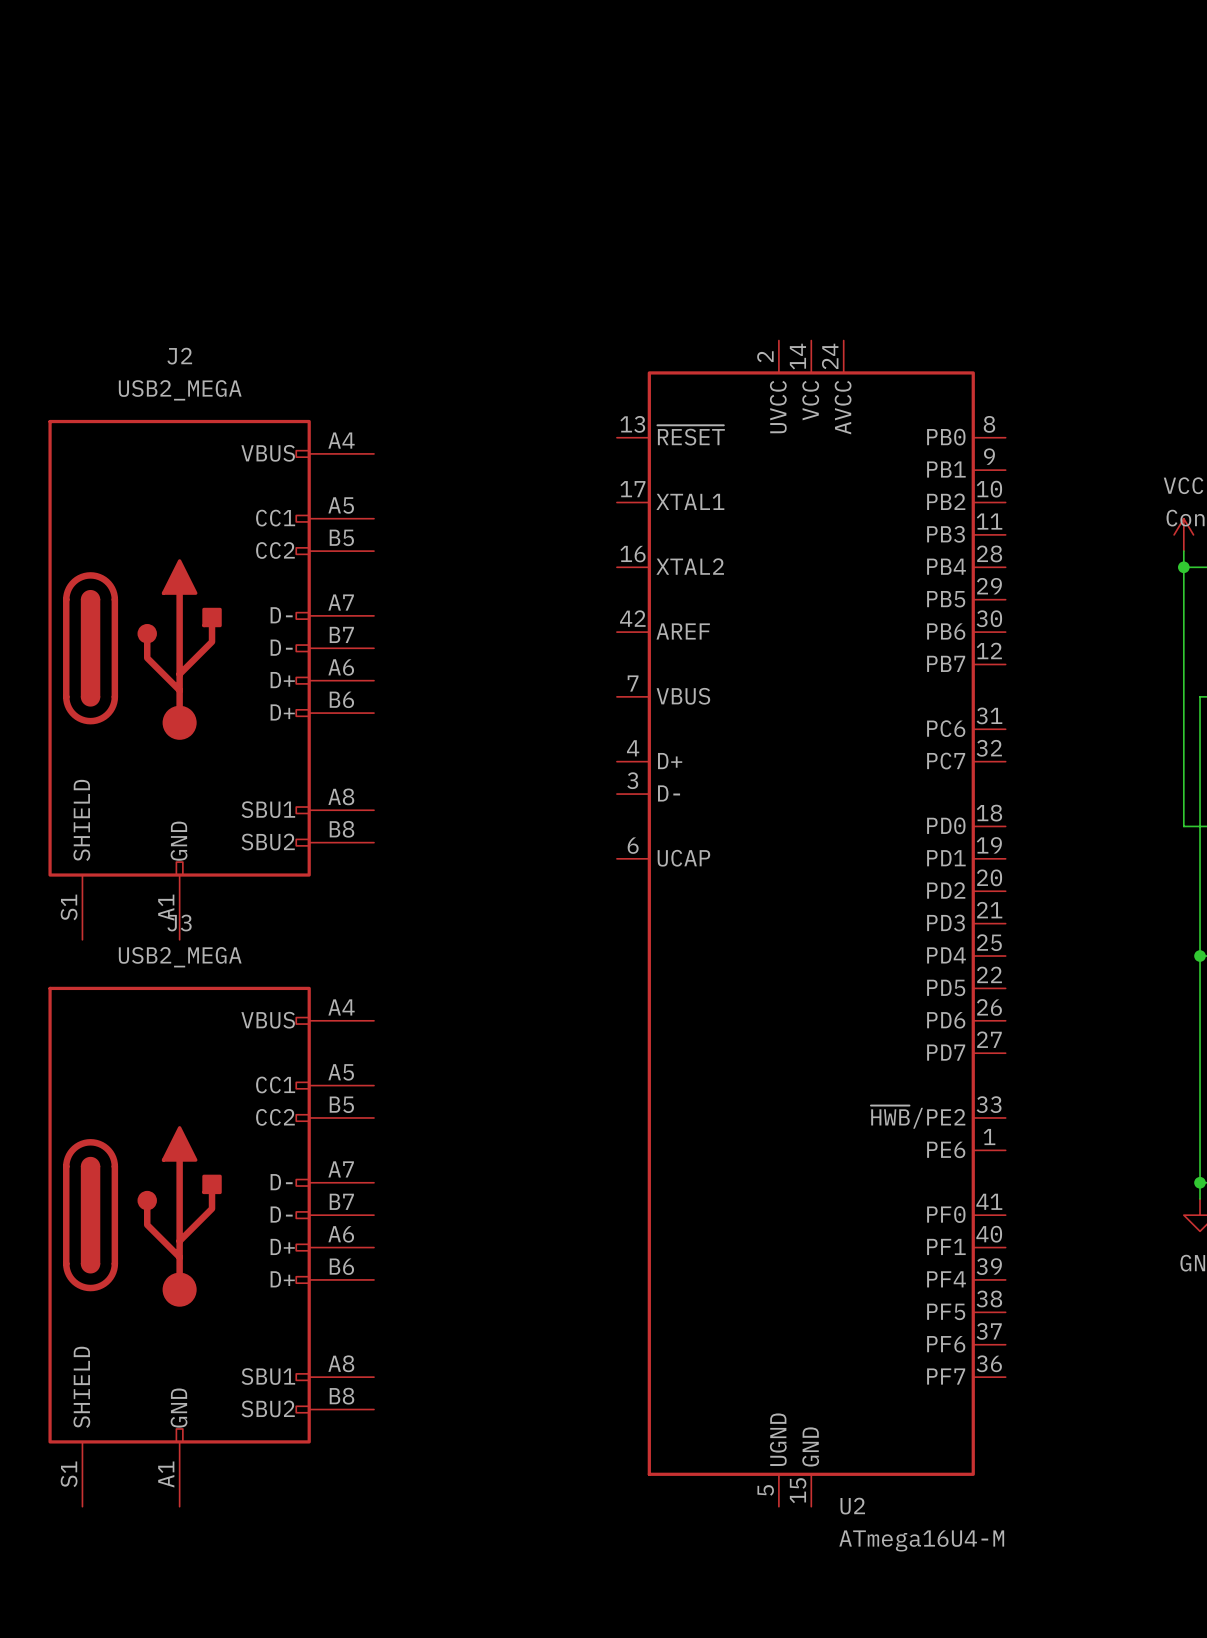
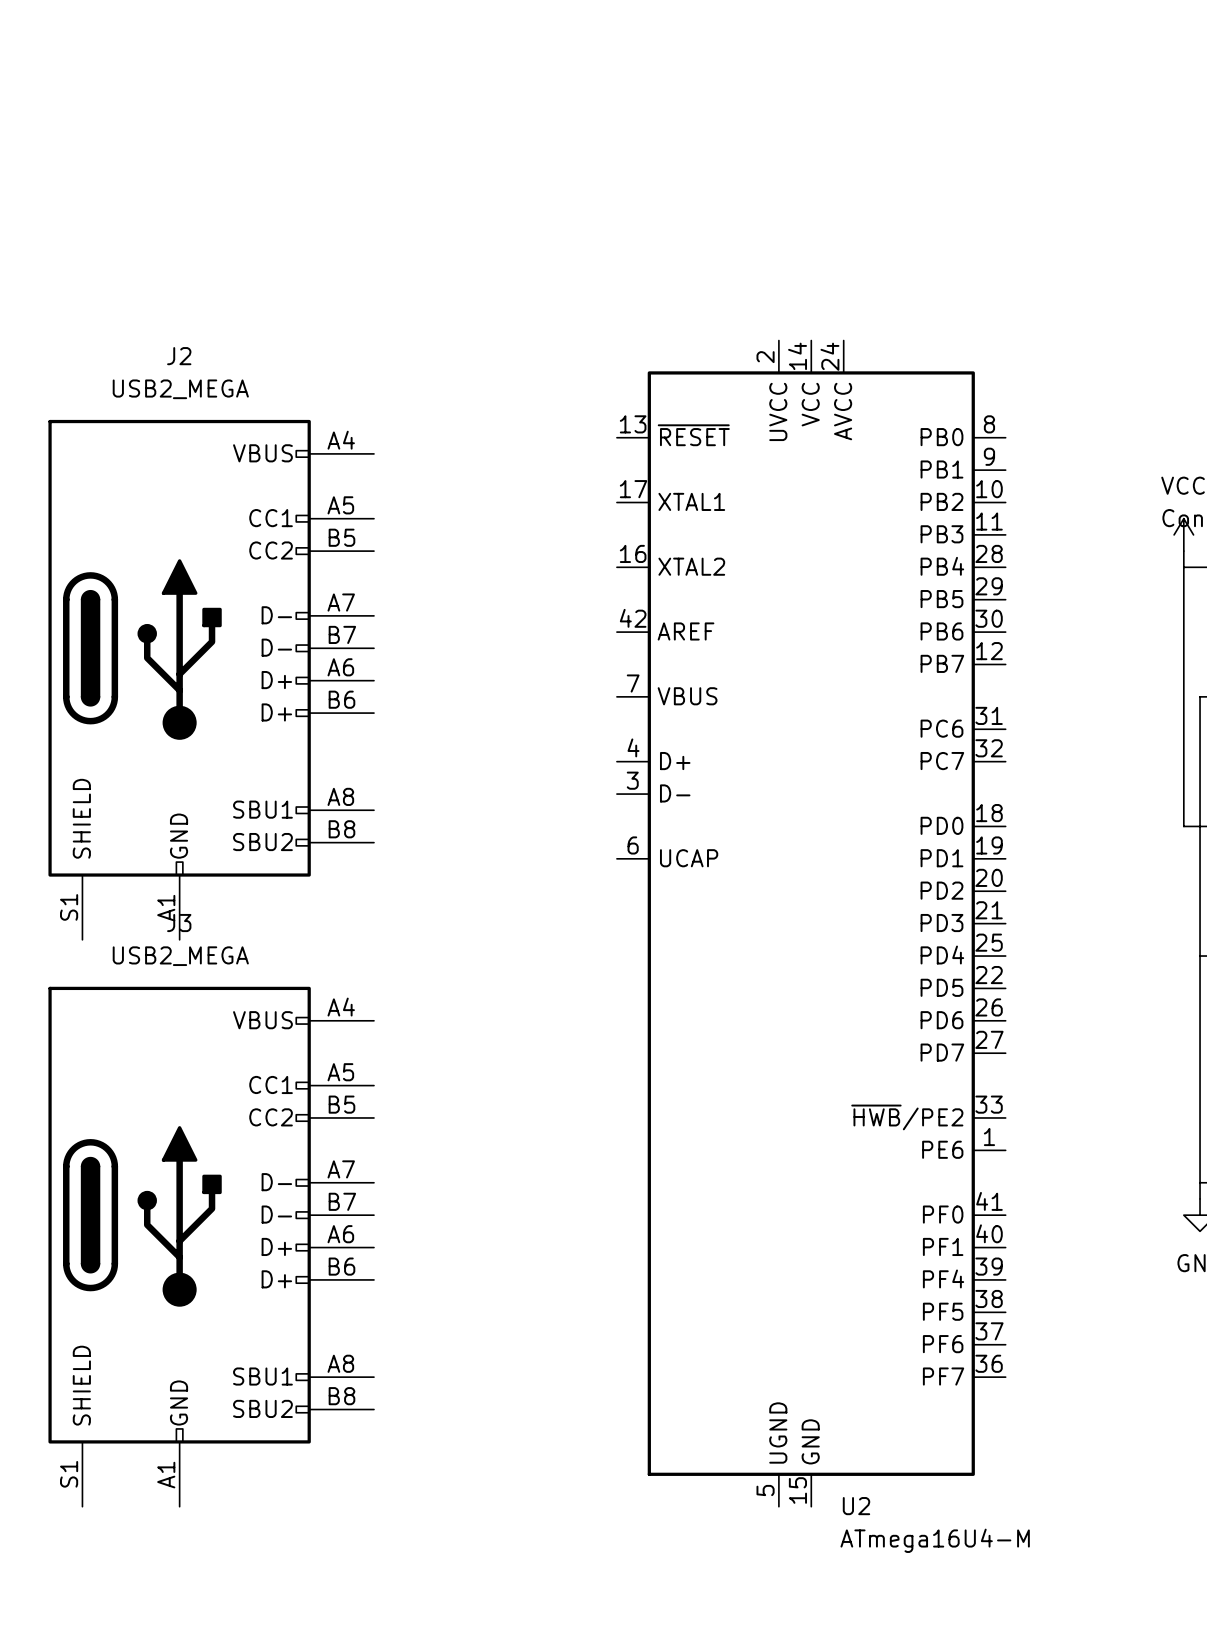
junction: (1183, 567) -> none
junction: (1200, 956) -> none
junction: (1200, 1182) -> none

